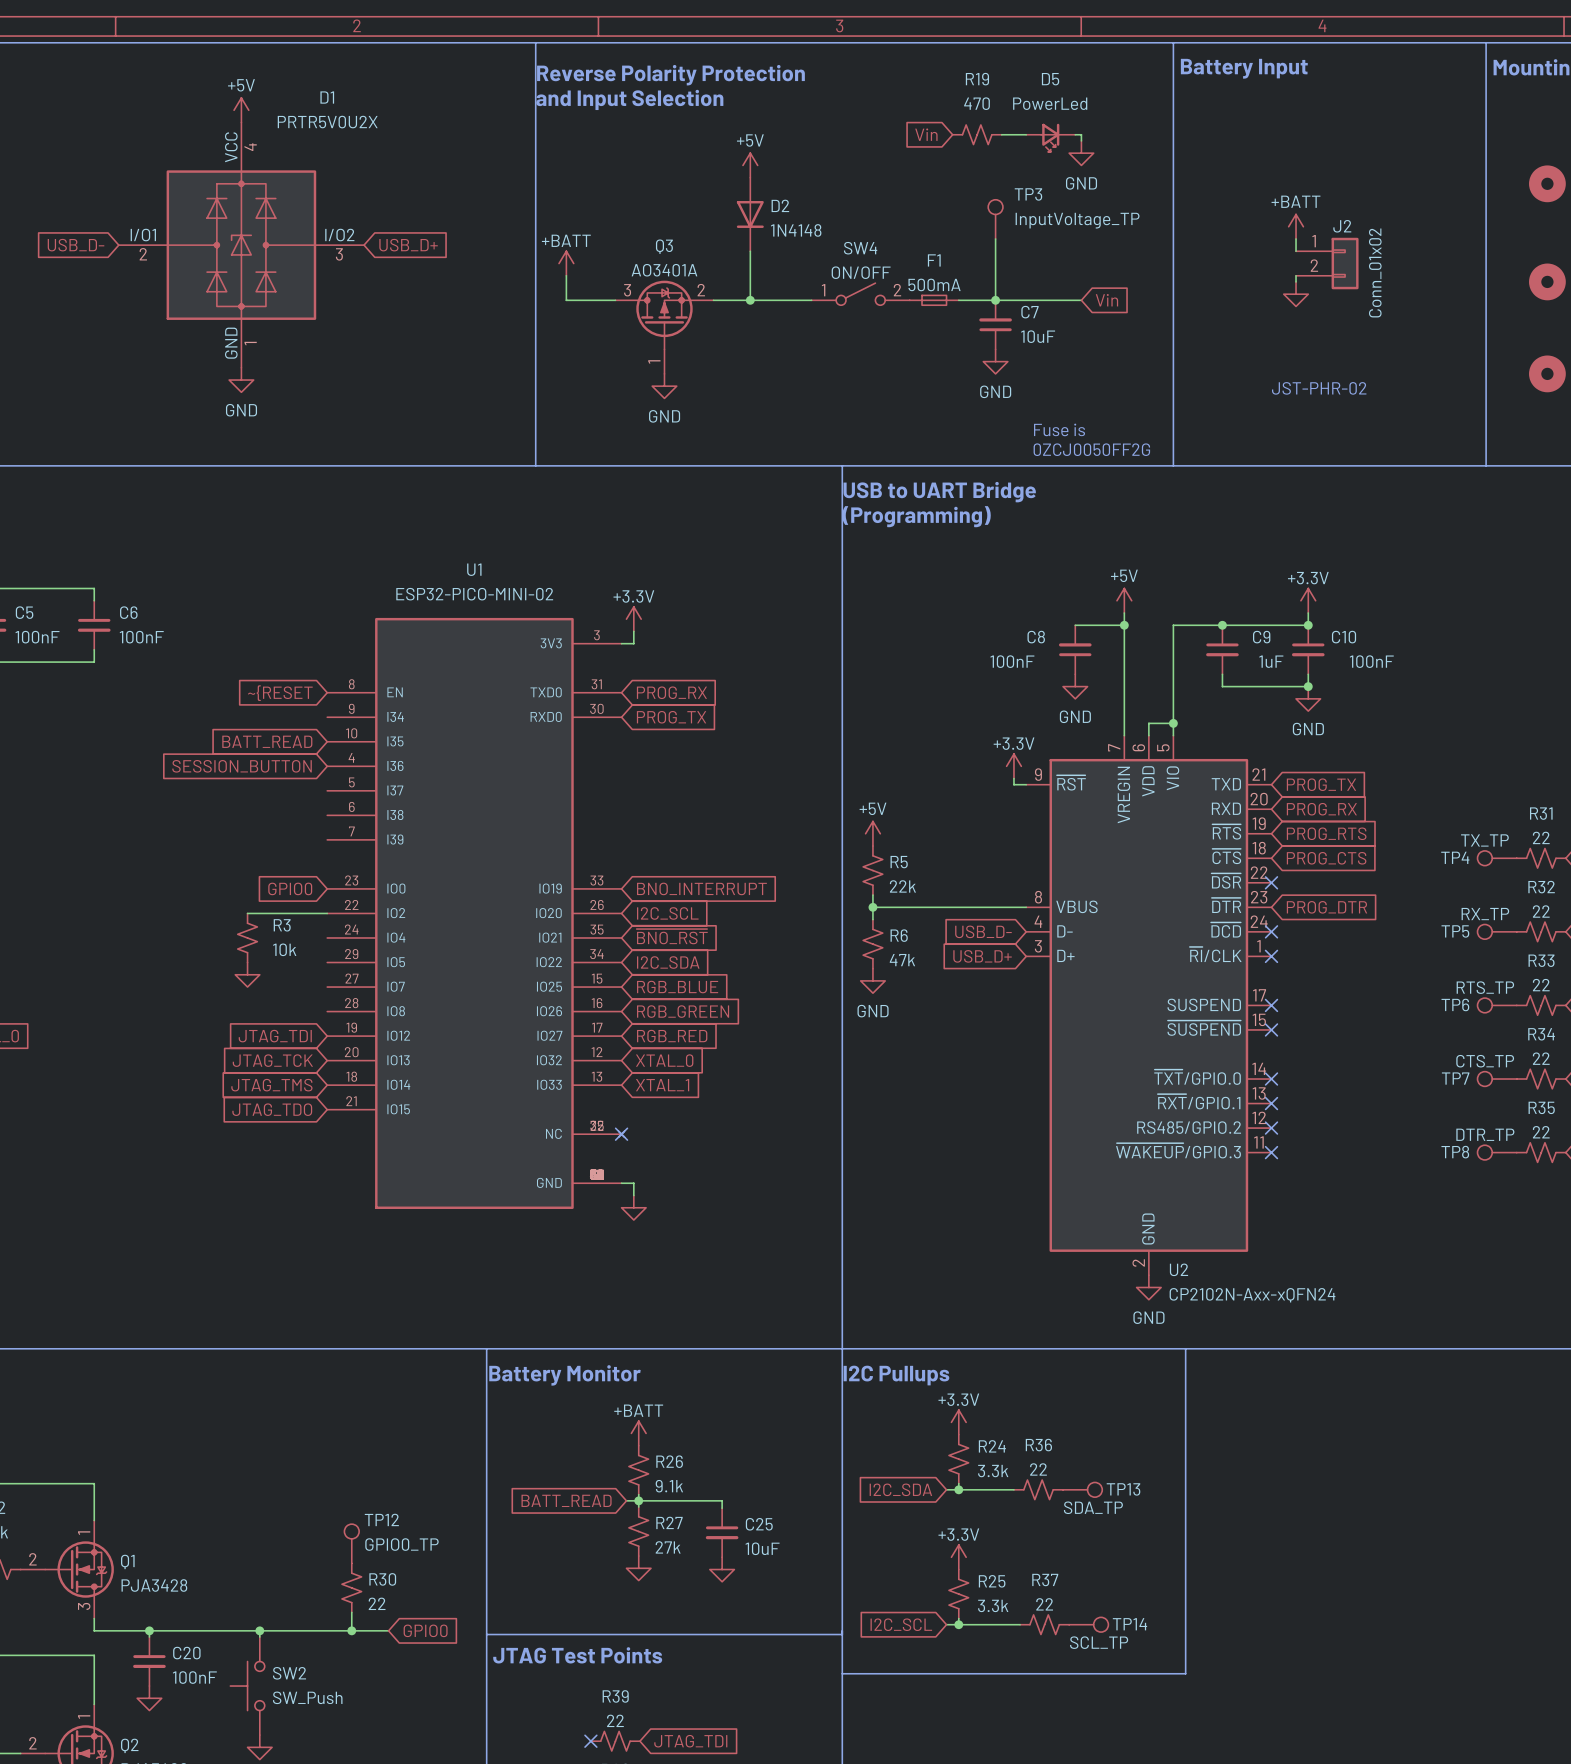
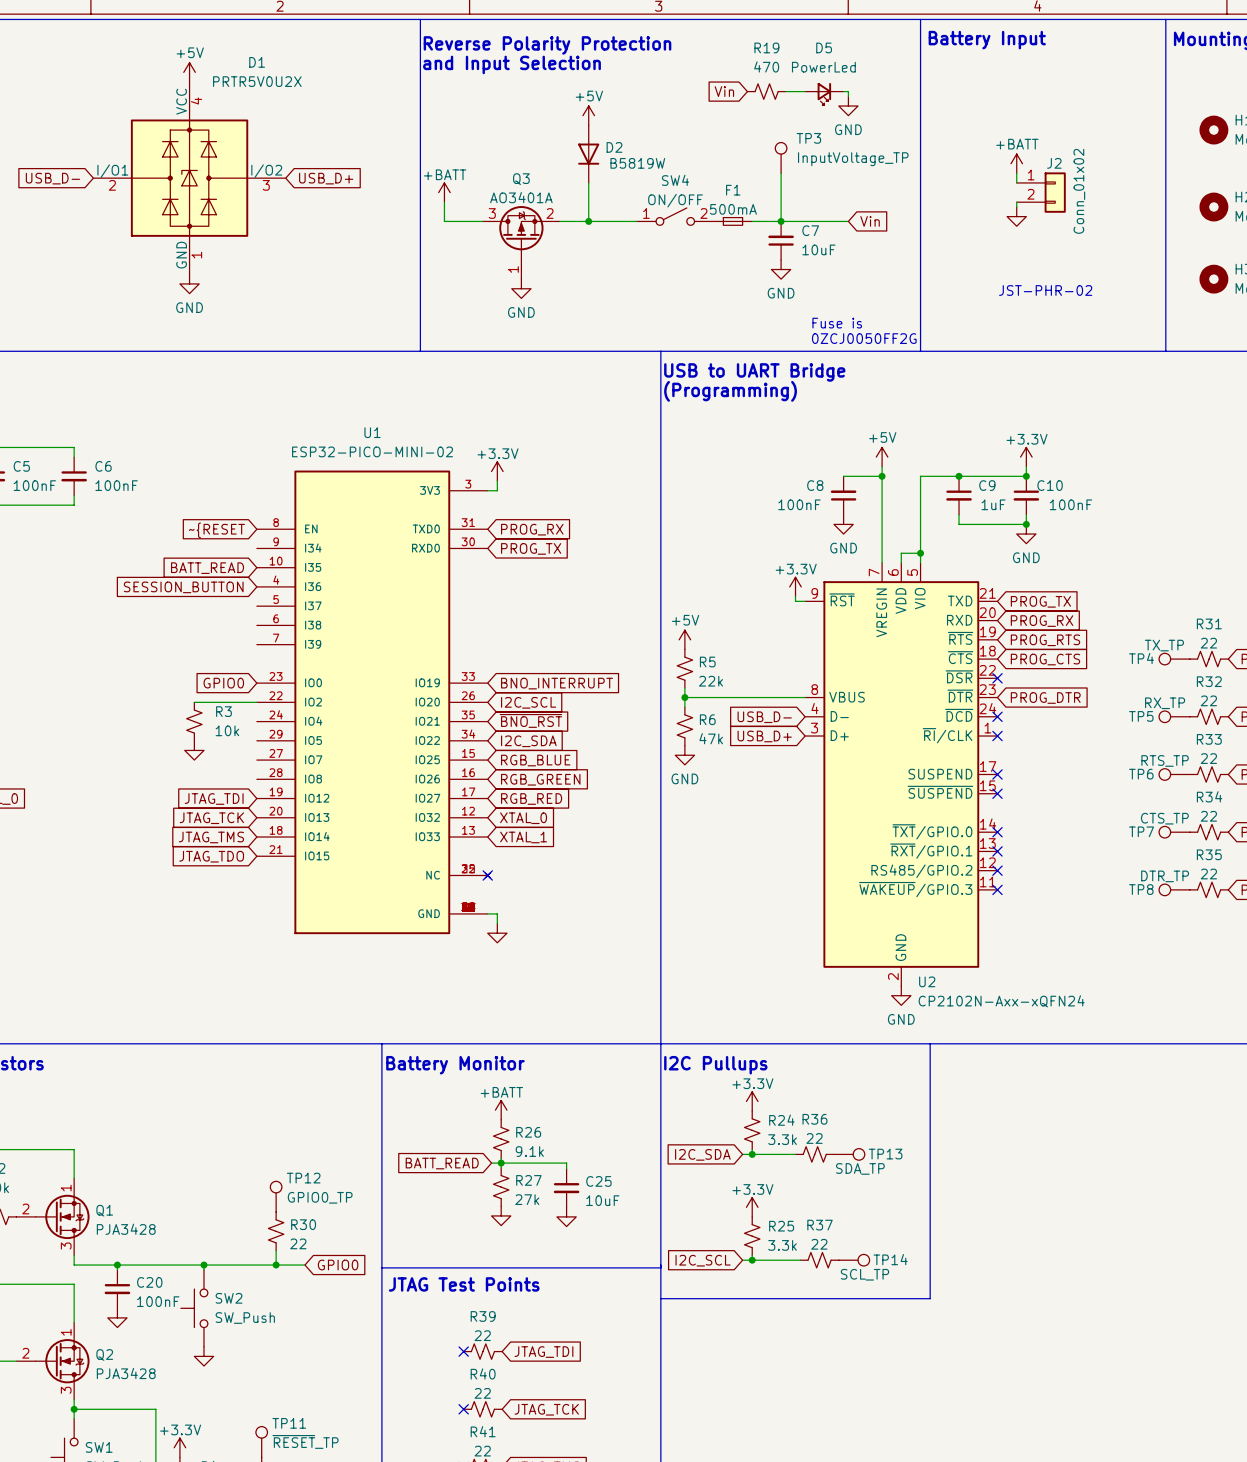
D2 value: 1N4148 (796, 230) -> B5819W (637, 163)

